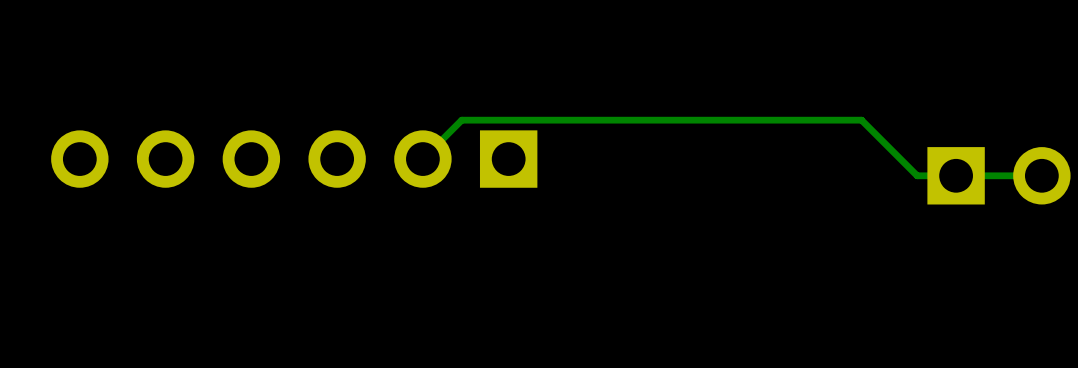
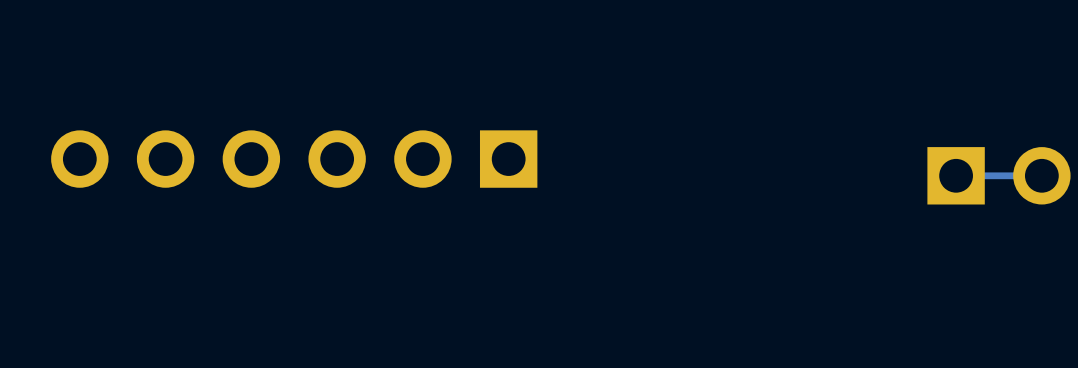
track: (422, 159) (461, 120) (861, 120) (917, 175) (956, 175) -> none

